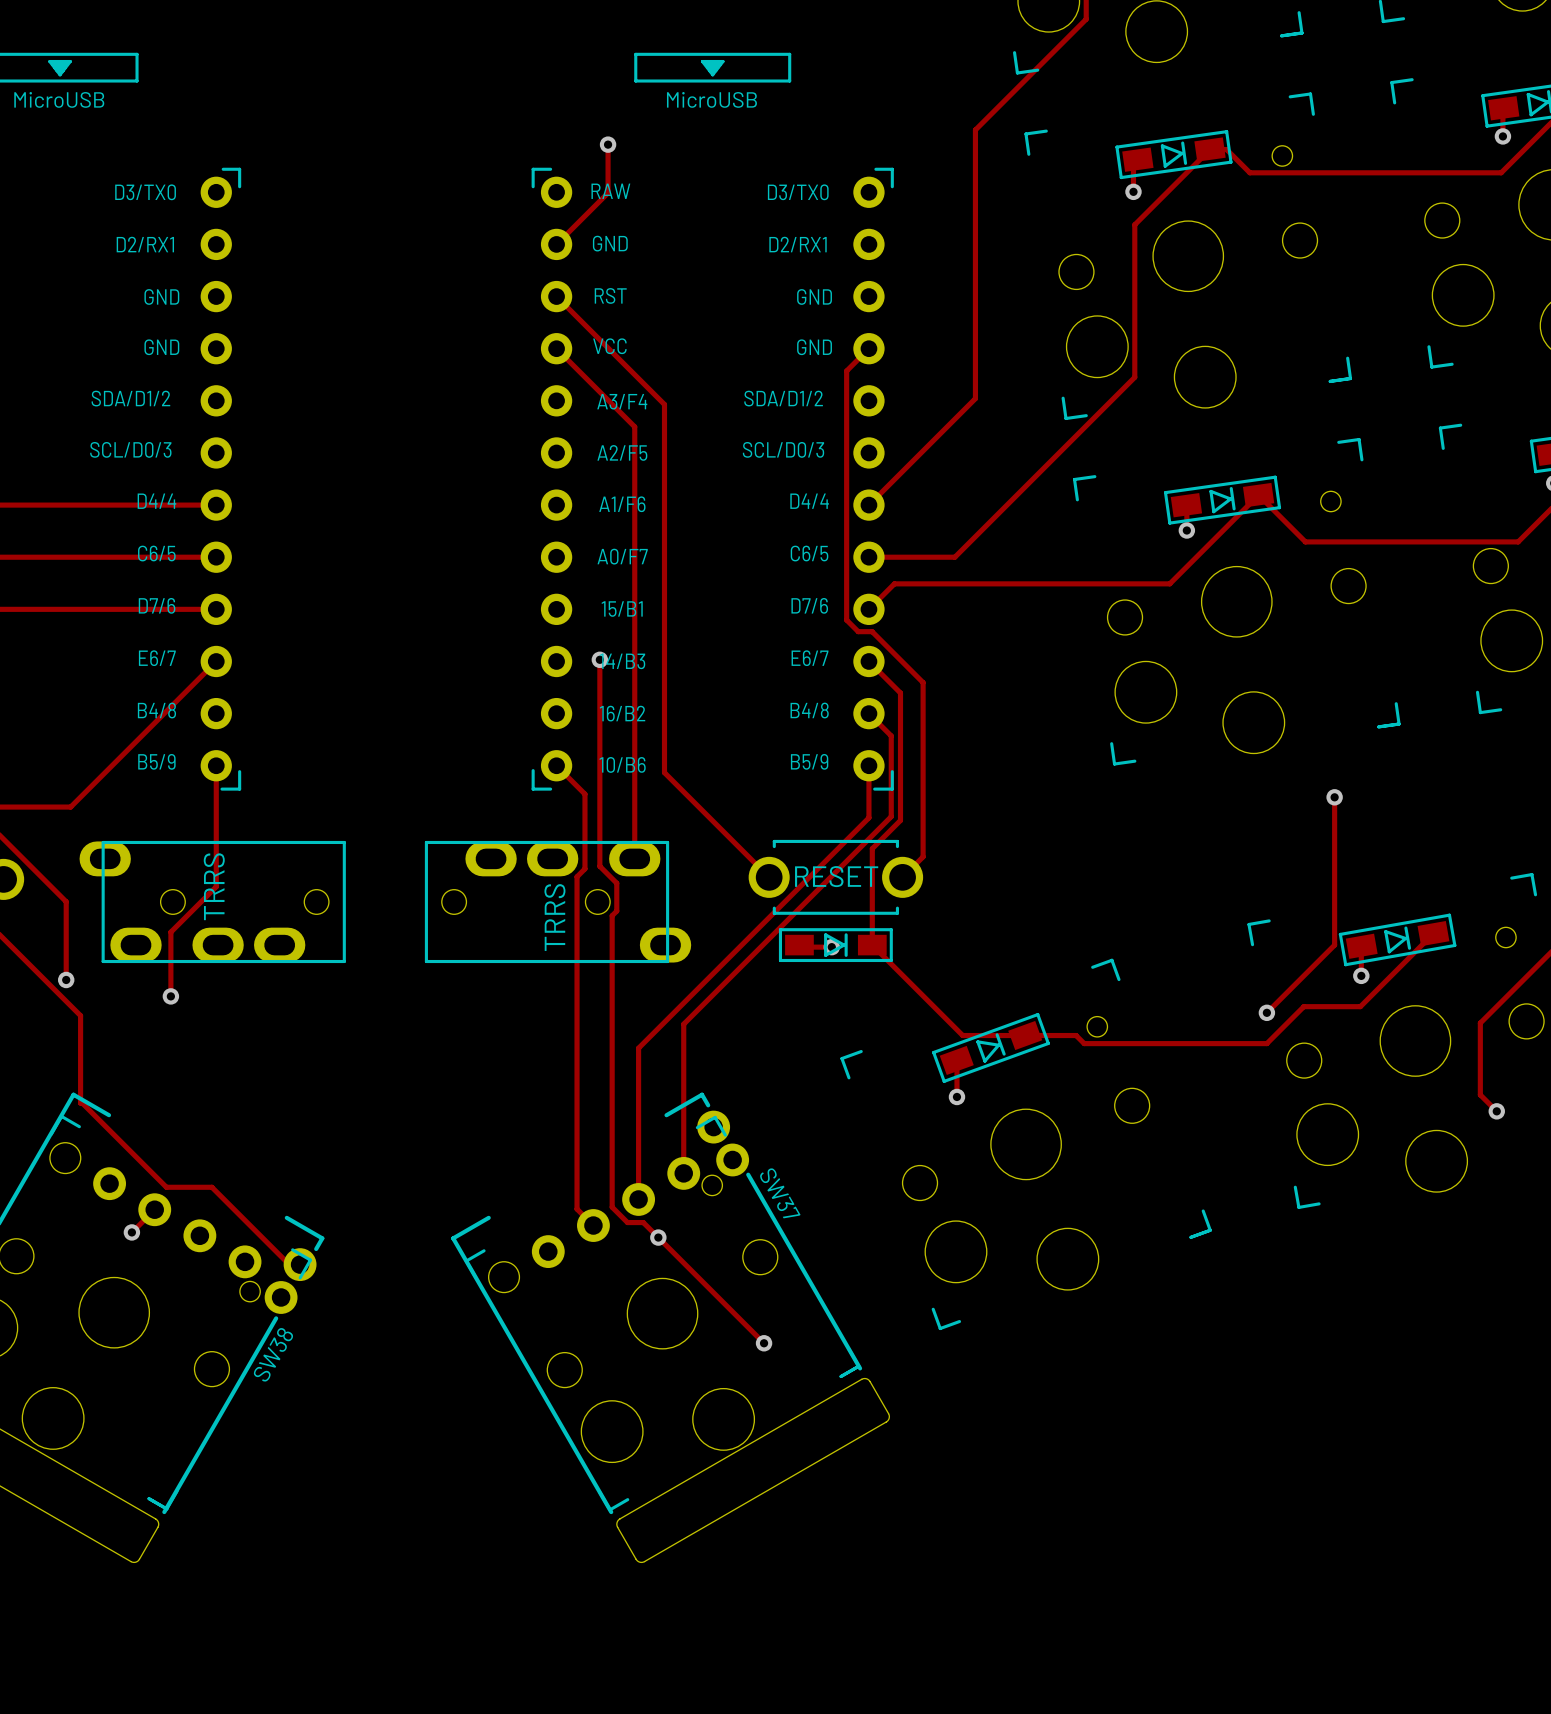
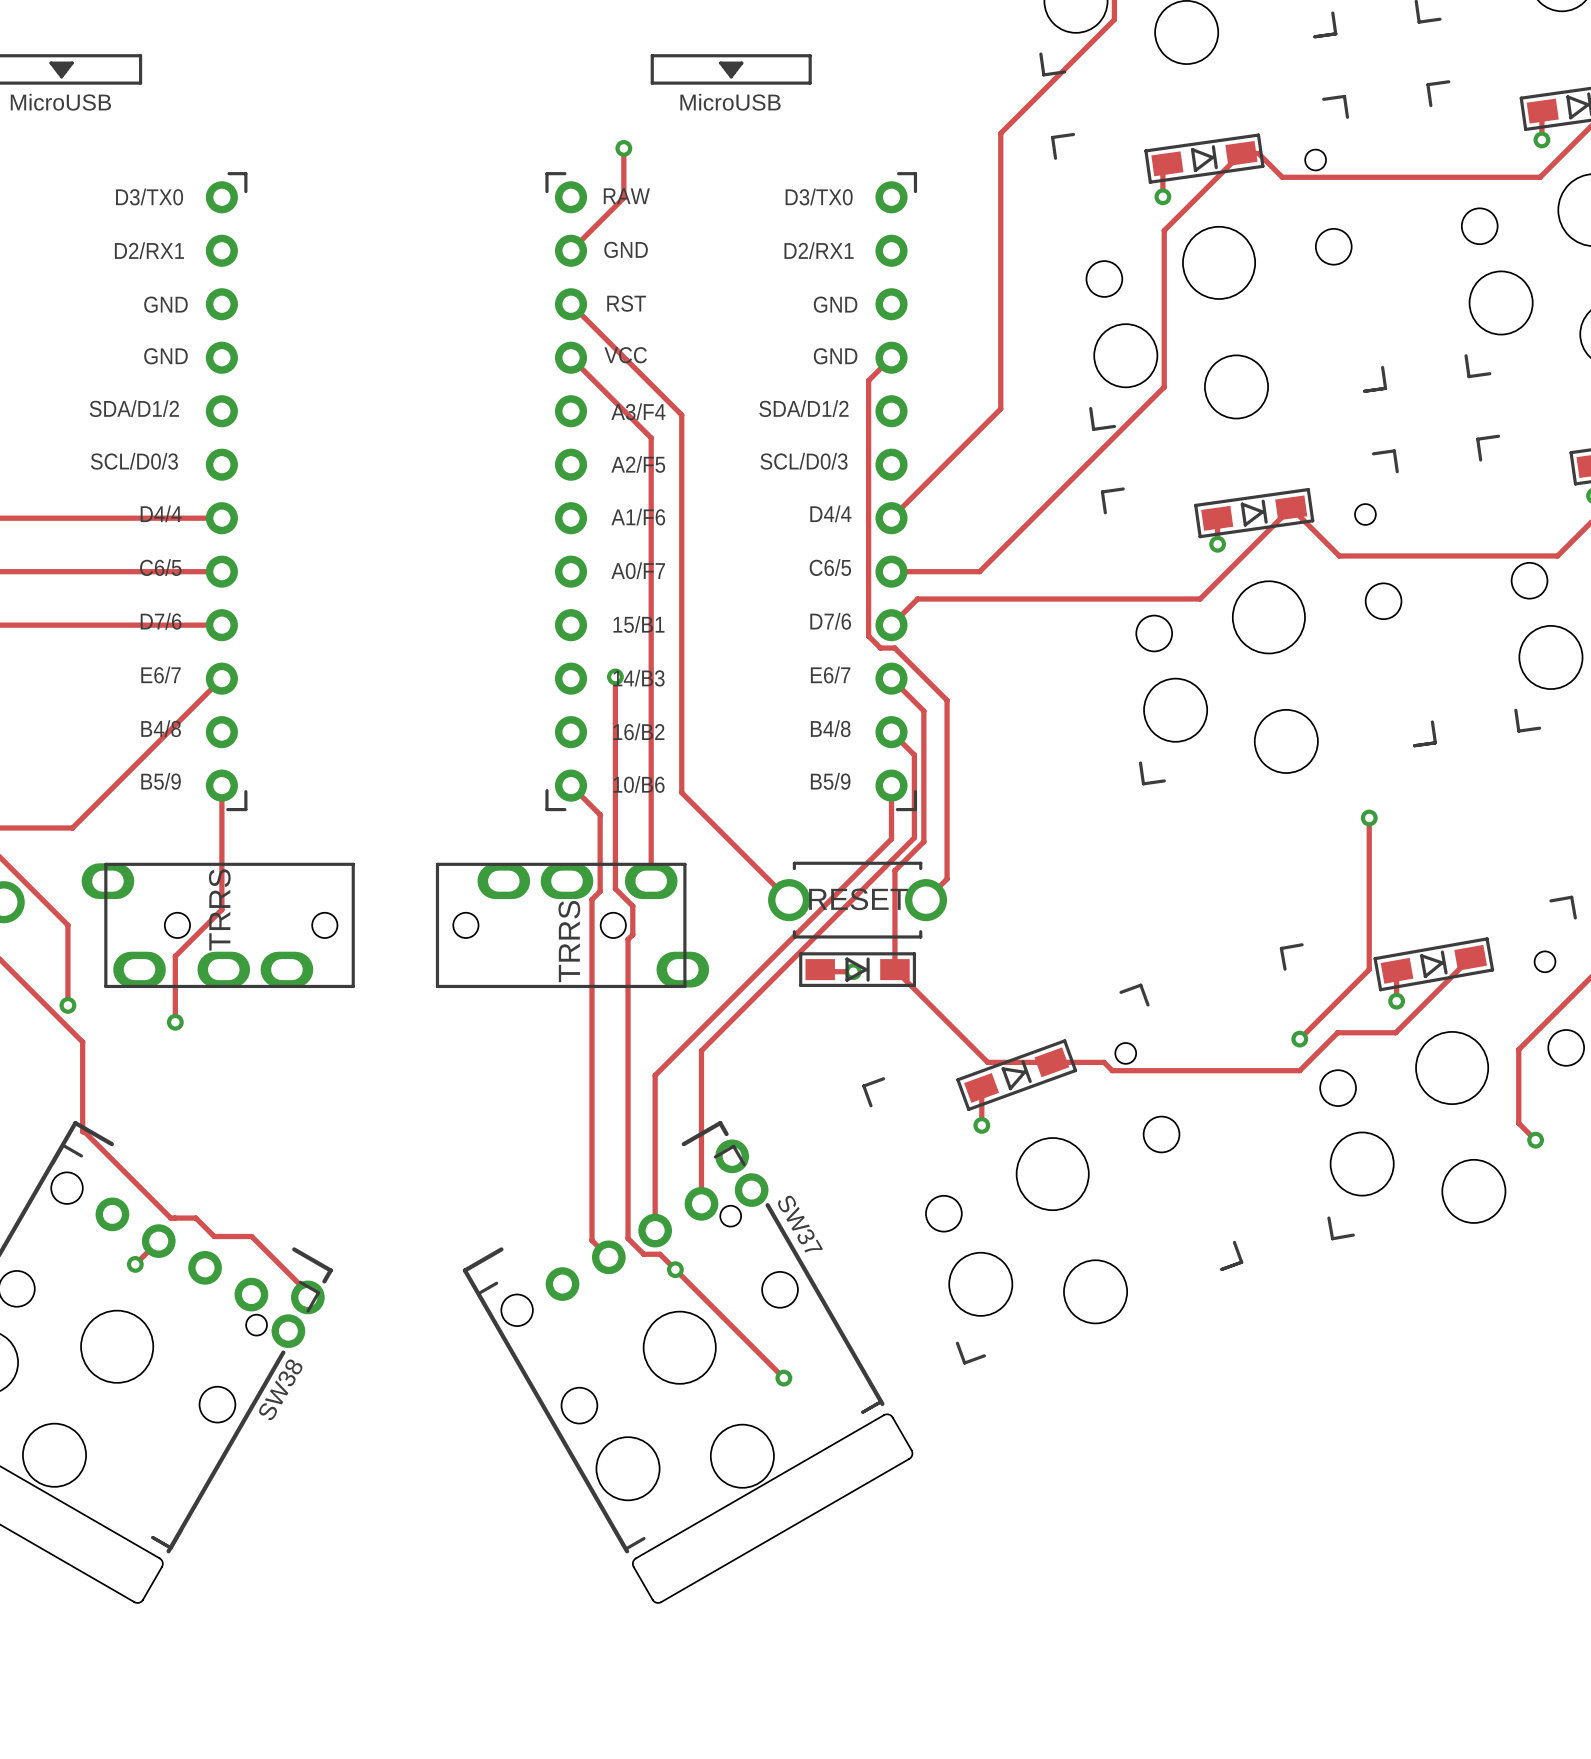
track: (190, 1187) (211, 1187) (289, 1264) (293, 1264) -> (195, 1218) (214, 1236) (251, 1236) (312, 1296)

